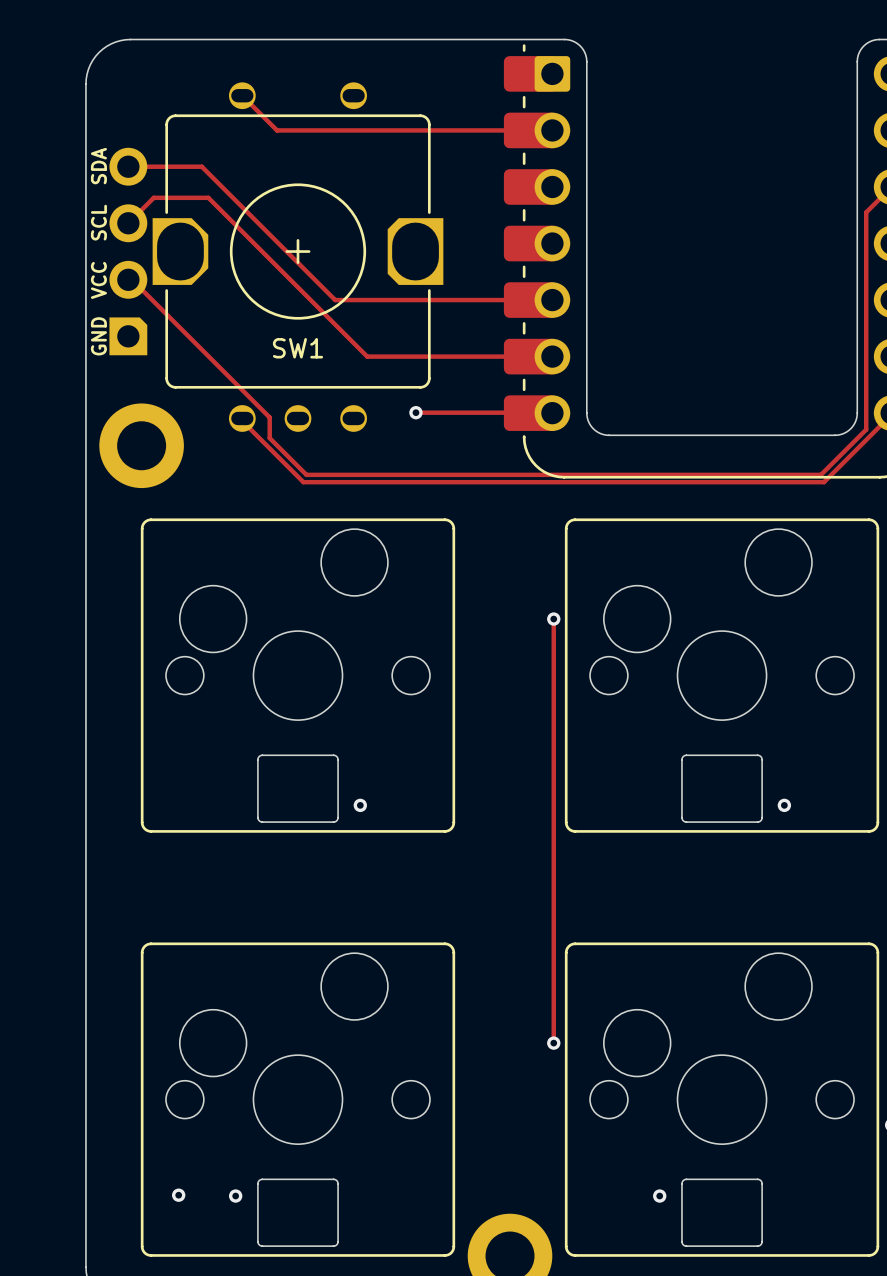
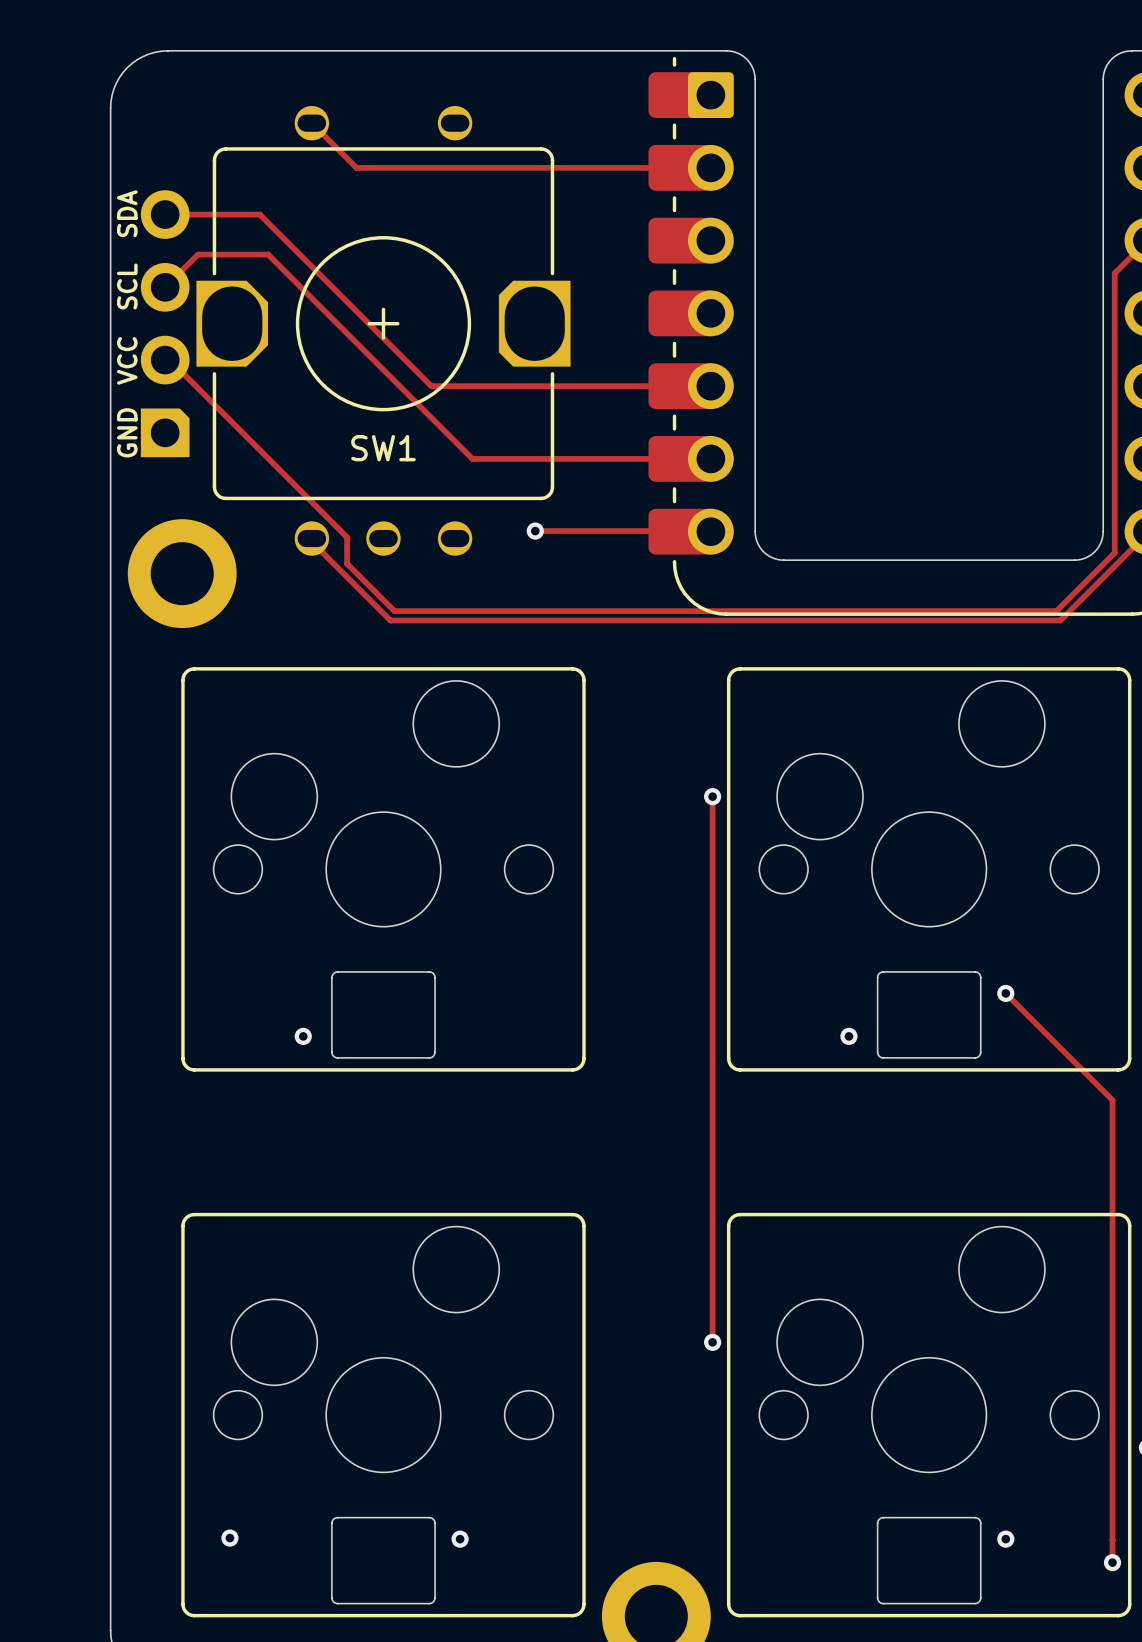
track: none -> (1005, 993) (1112, 1100) (1112, 1540)
via position: (360, 805) -> (303, 1036)
via: none -> (848, 1036)
via position: (784, 805) -> (1005, 993)
via position: (235, 1196) -> (460, 1539)
via: (659, 1196) -> none
via: none -> (1005, 1539)
track: none -> (1112, 1540) (1112, 1562)
via: none -> (1112, 1562)

